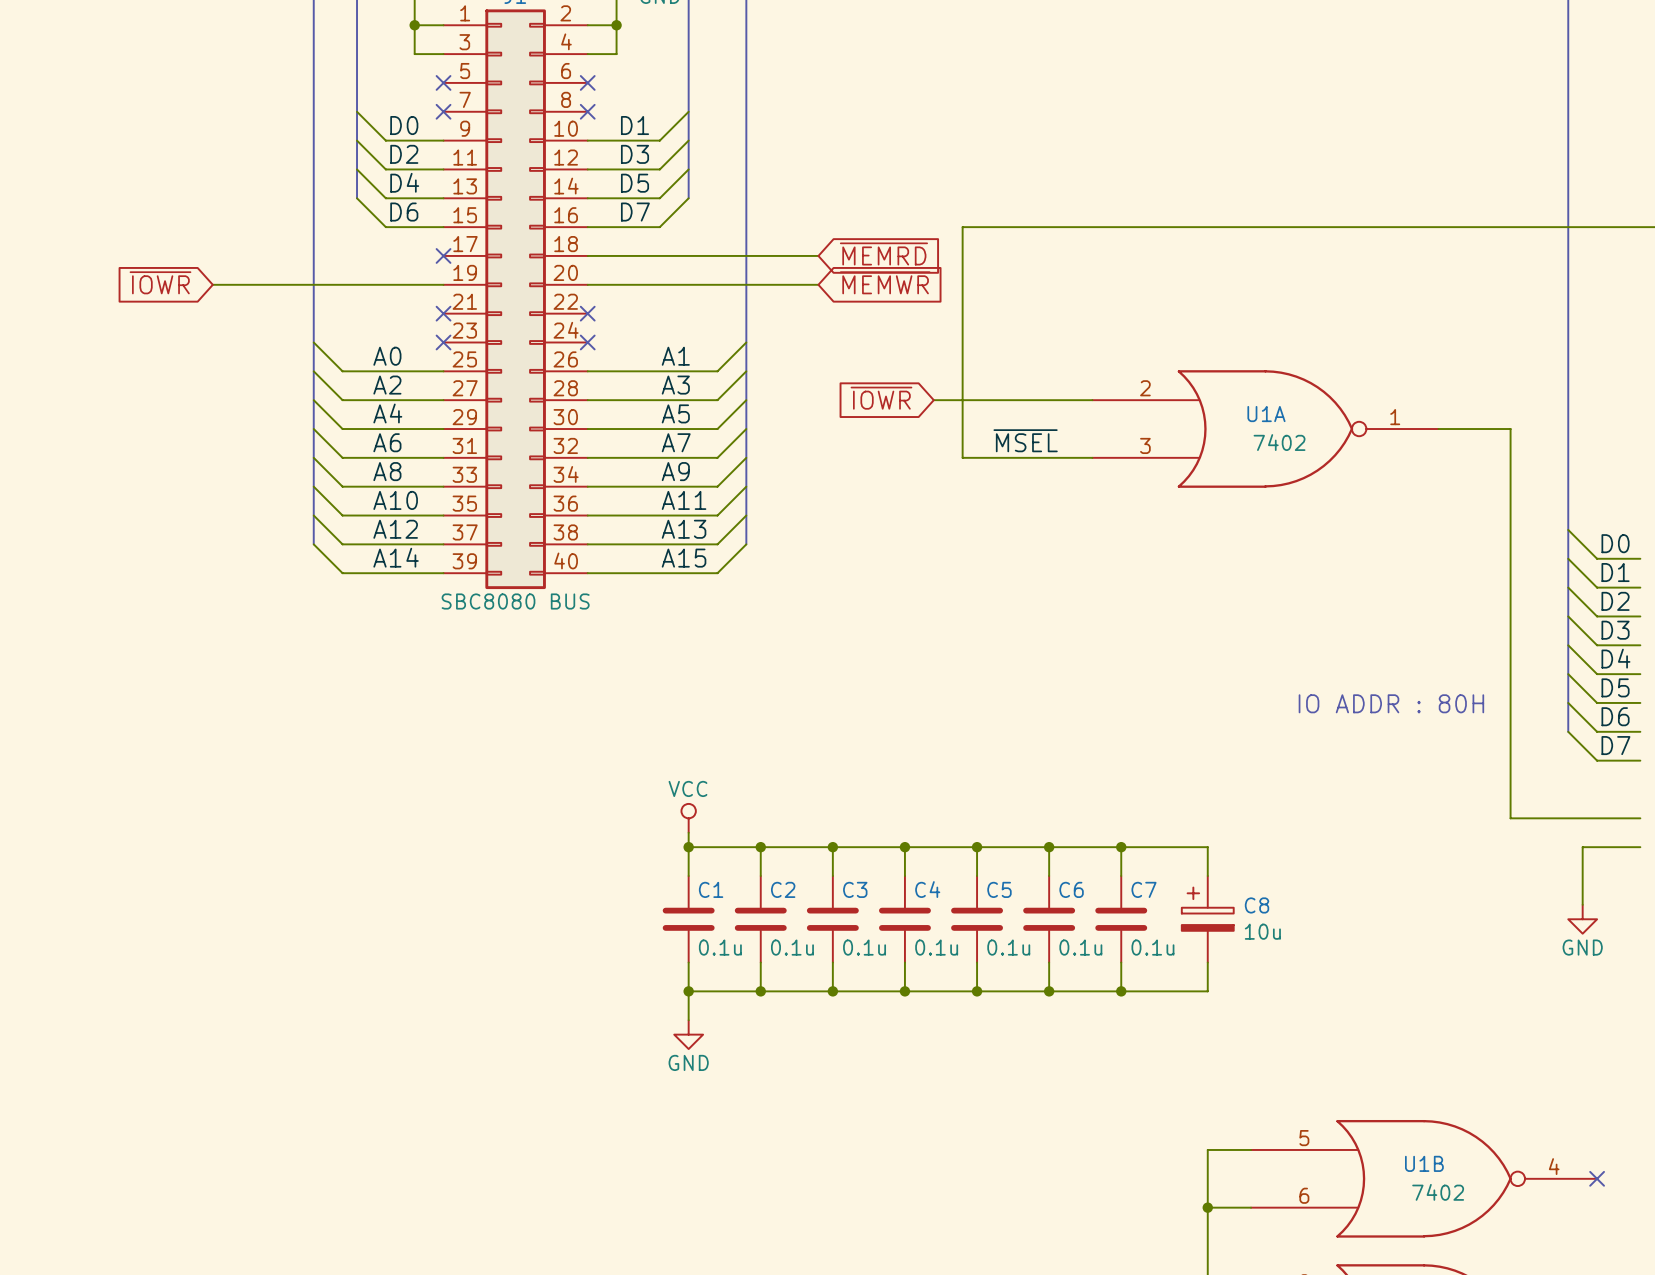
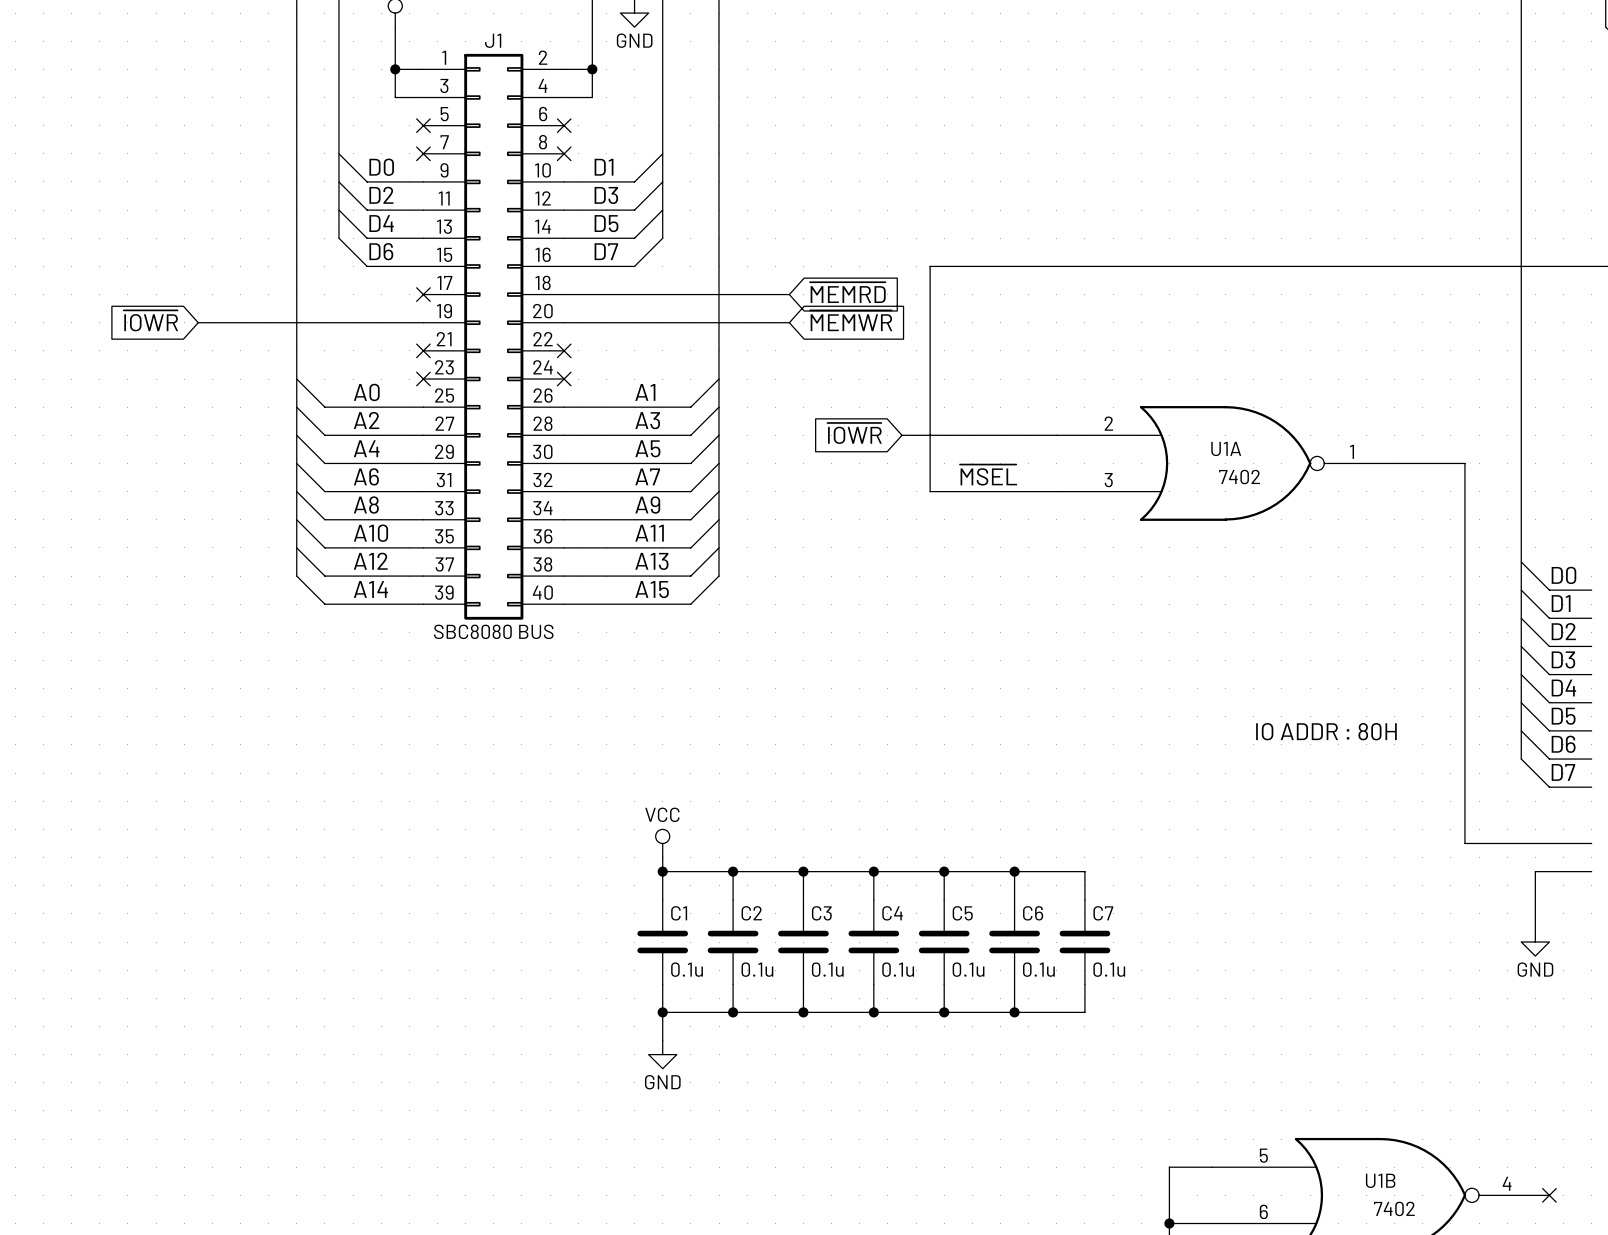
wire: (1121, 847) (1207, 847) (1207, 876) -> none
junction: (1121, 847) -> none
C8: 10u (1207, 919) -> none
wire: (1207, 962) (1207, 991) (1121, 991) -> none
junction: (1121, 991) -> none

